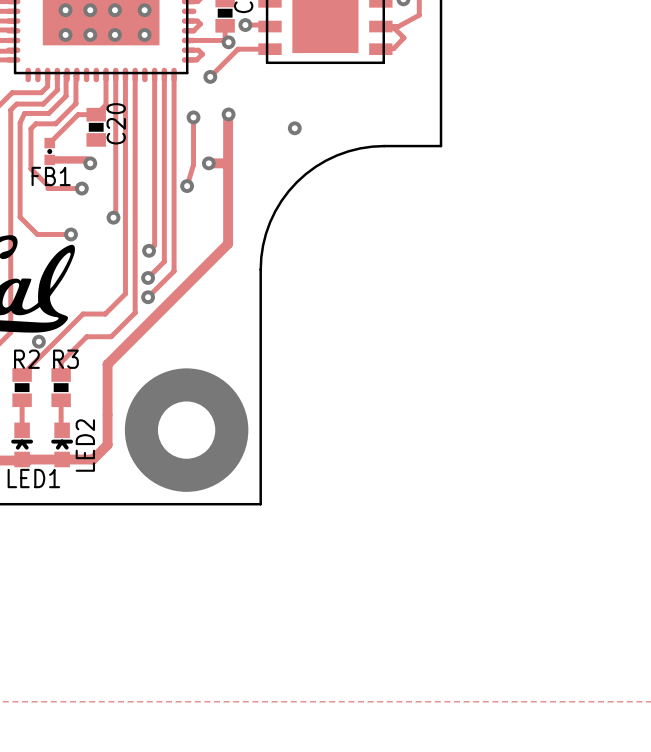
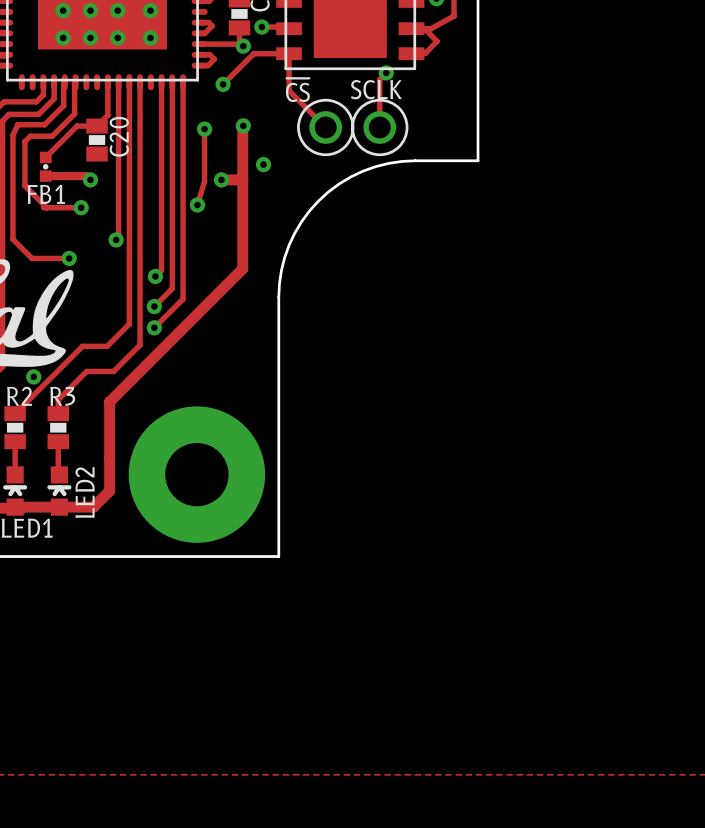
track: none -> (289, 53) (289, 90) (325, 127)
track: none -> (386, 72) (379, 79) (379, 127)
via: none -> (386, 72)
~{CS}: none -> (325, 127)
SCLK: none -> (379, 127)
via: (294, 128) -> none
via: none -> (263, 164)

